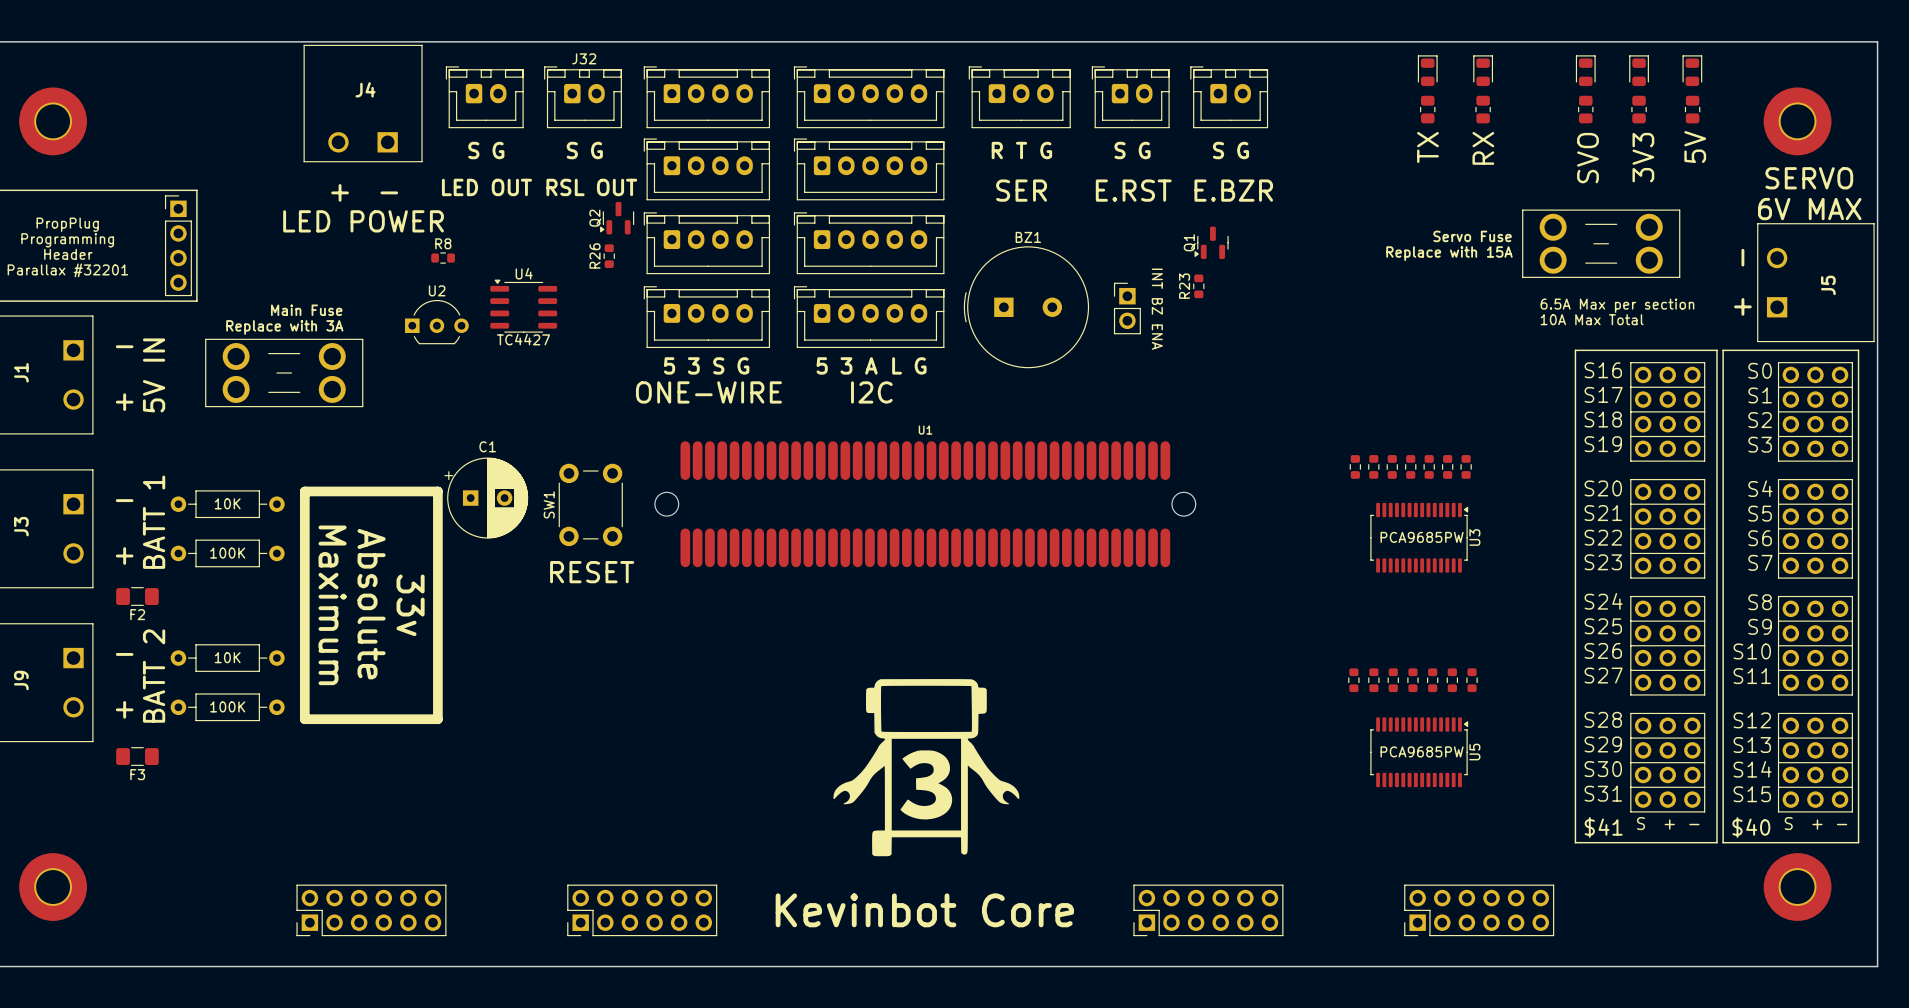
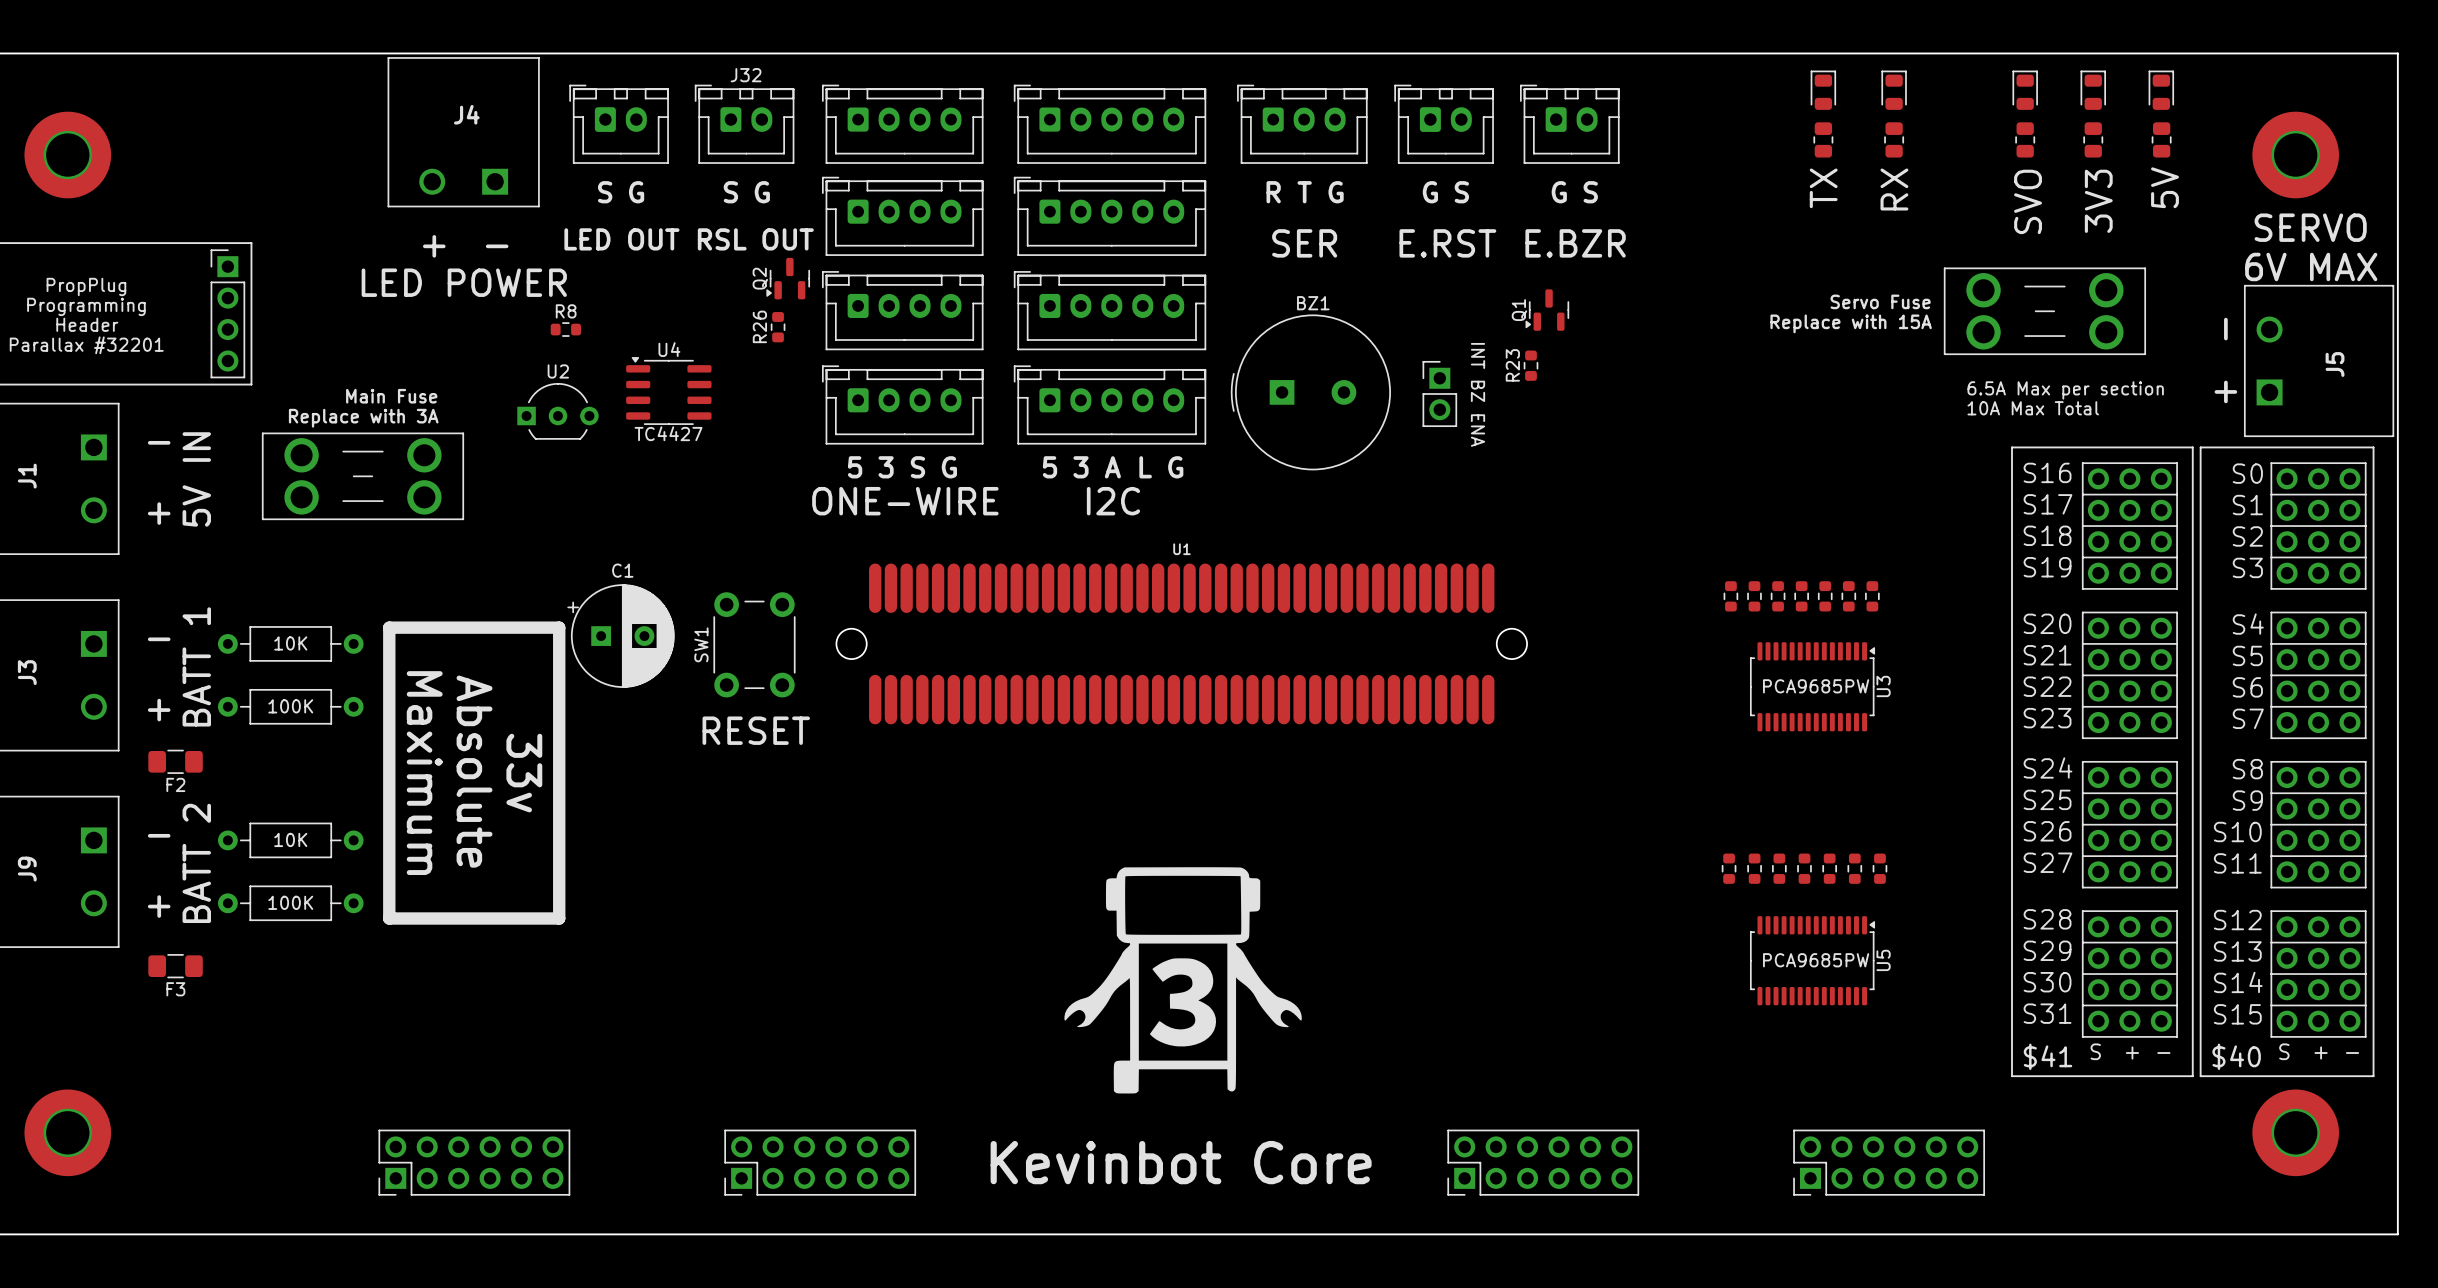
text: S (1120, 150) -> G (1430, 192)
text: G (1144, 150) -> S (1461, 192)
text: S (1218, 150) -> G (1559, 192)
text: G (1243, 150) -> S (1590, 192)

